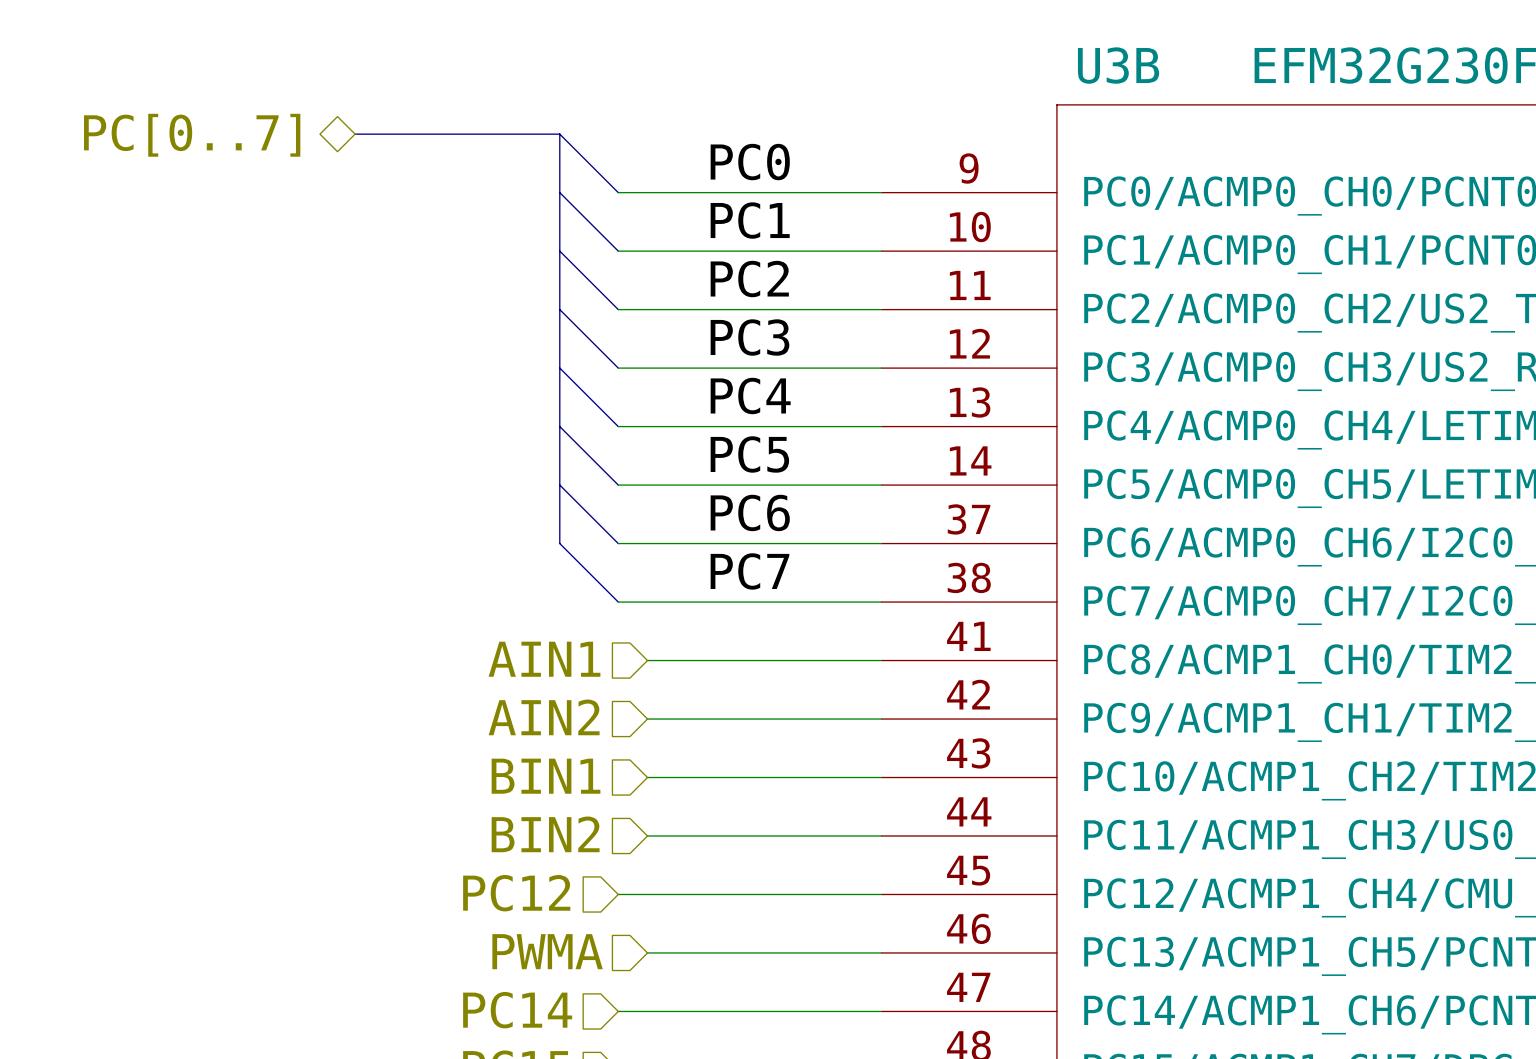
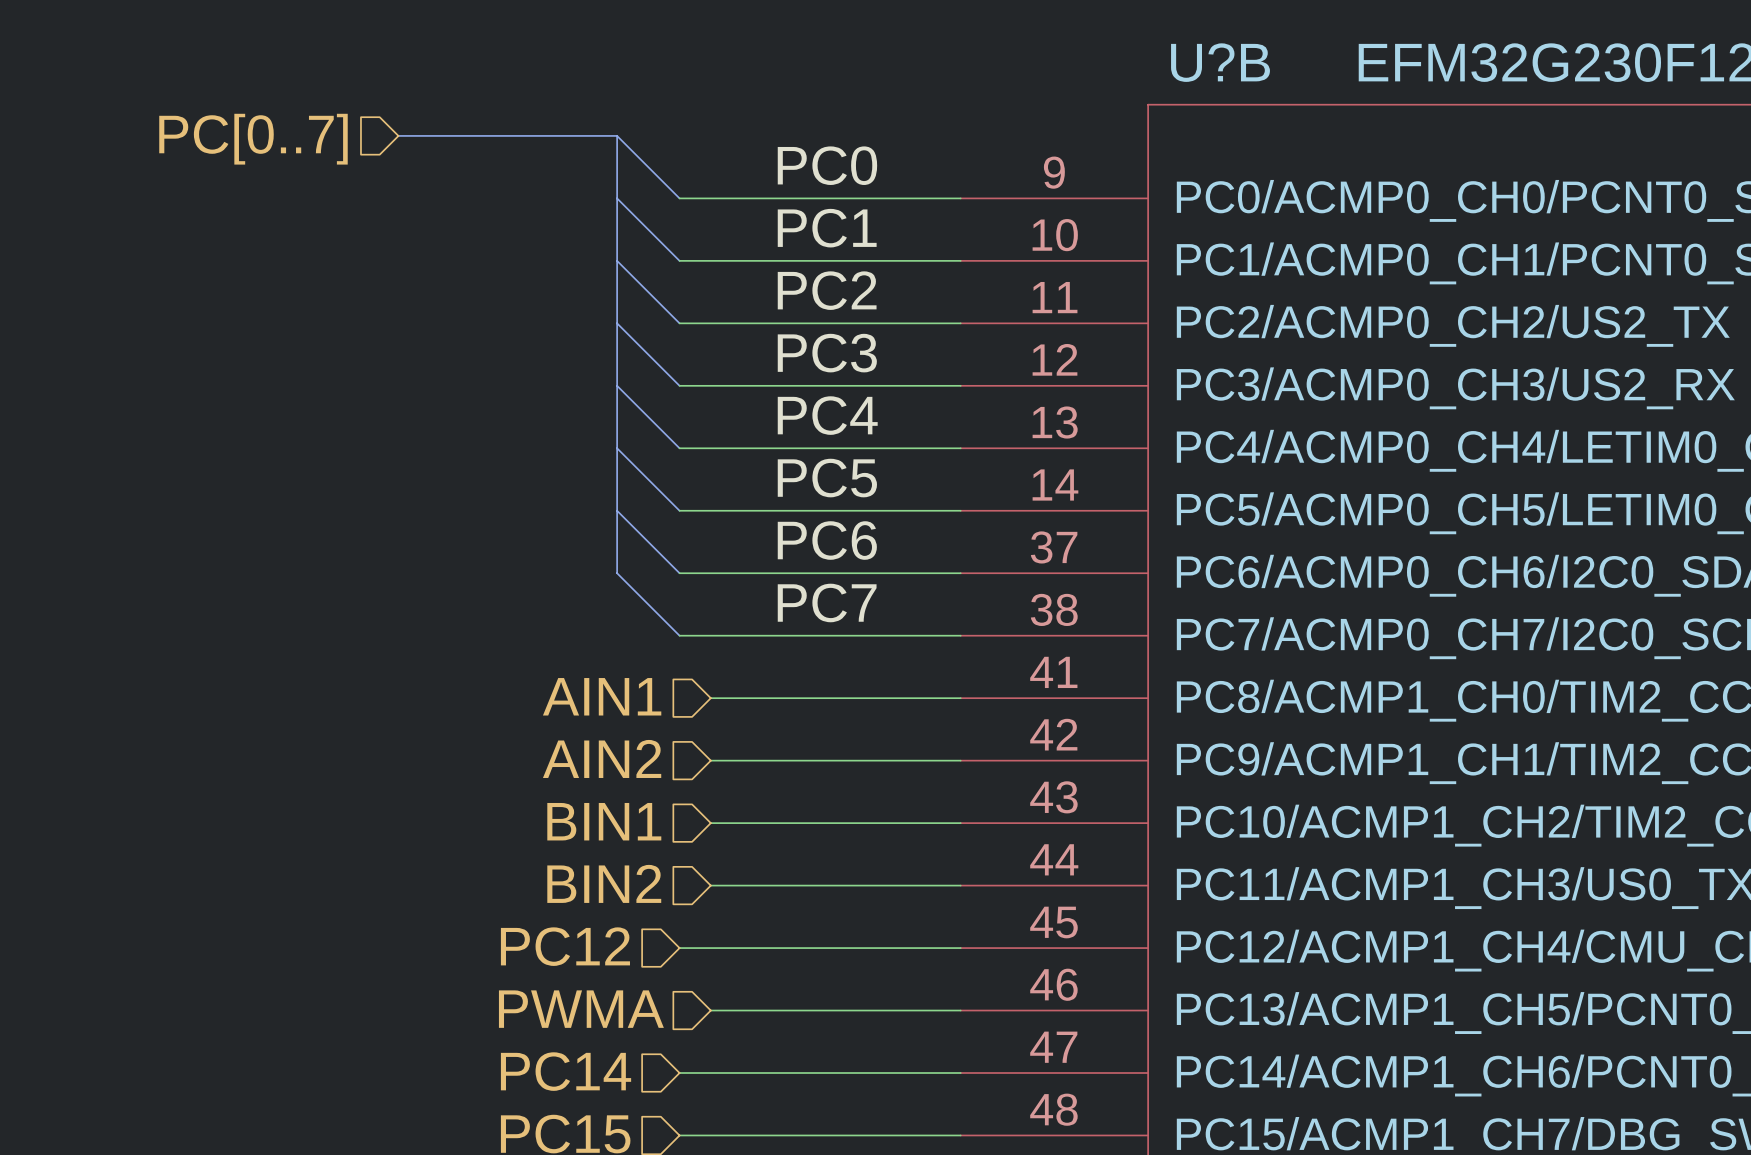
U3B name: U3B (1118, 65) -> U?B (1220, 62)
hierarchical label shape: bidirectional (192, 135) -> input (253, 139)

